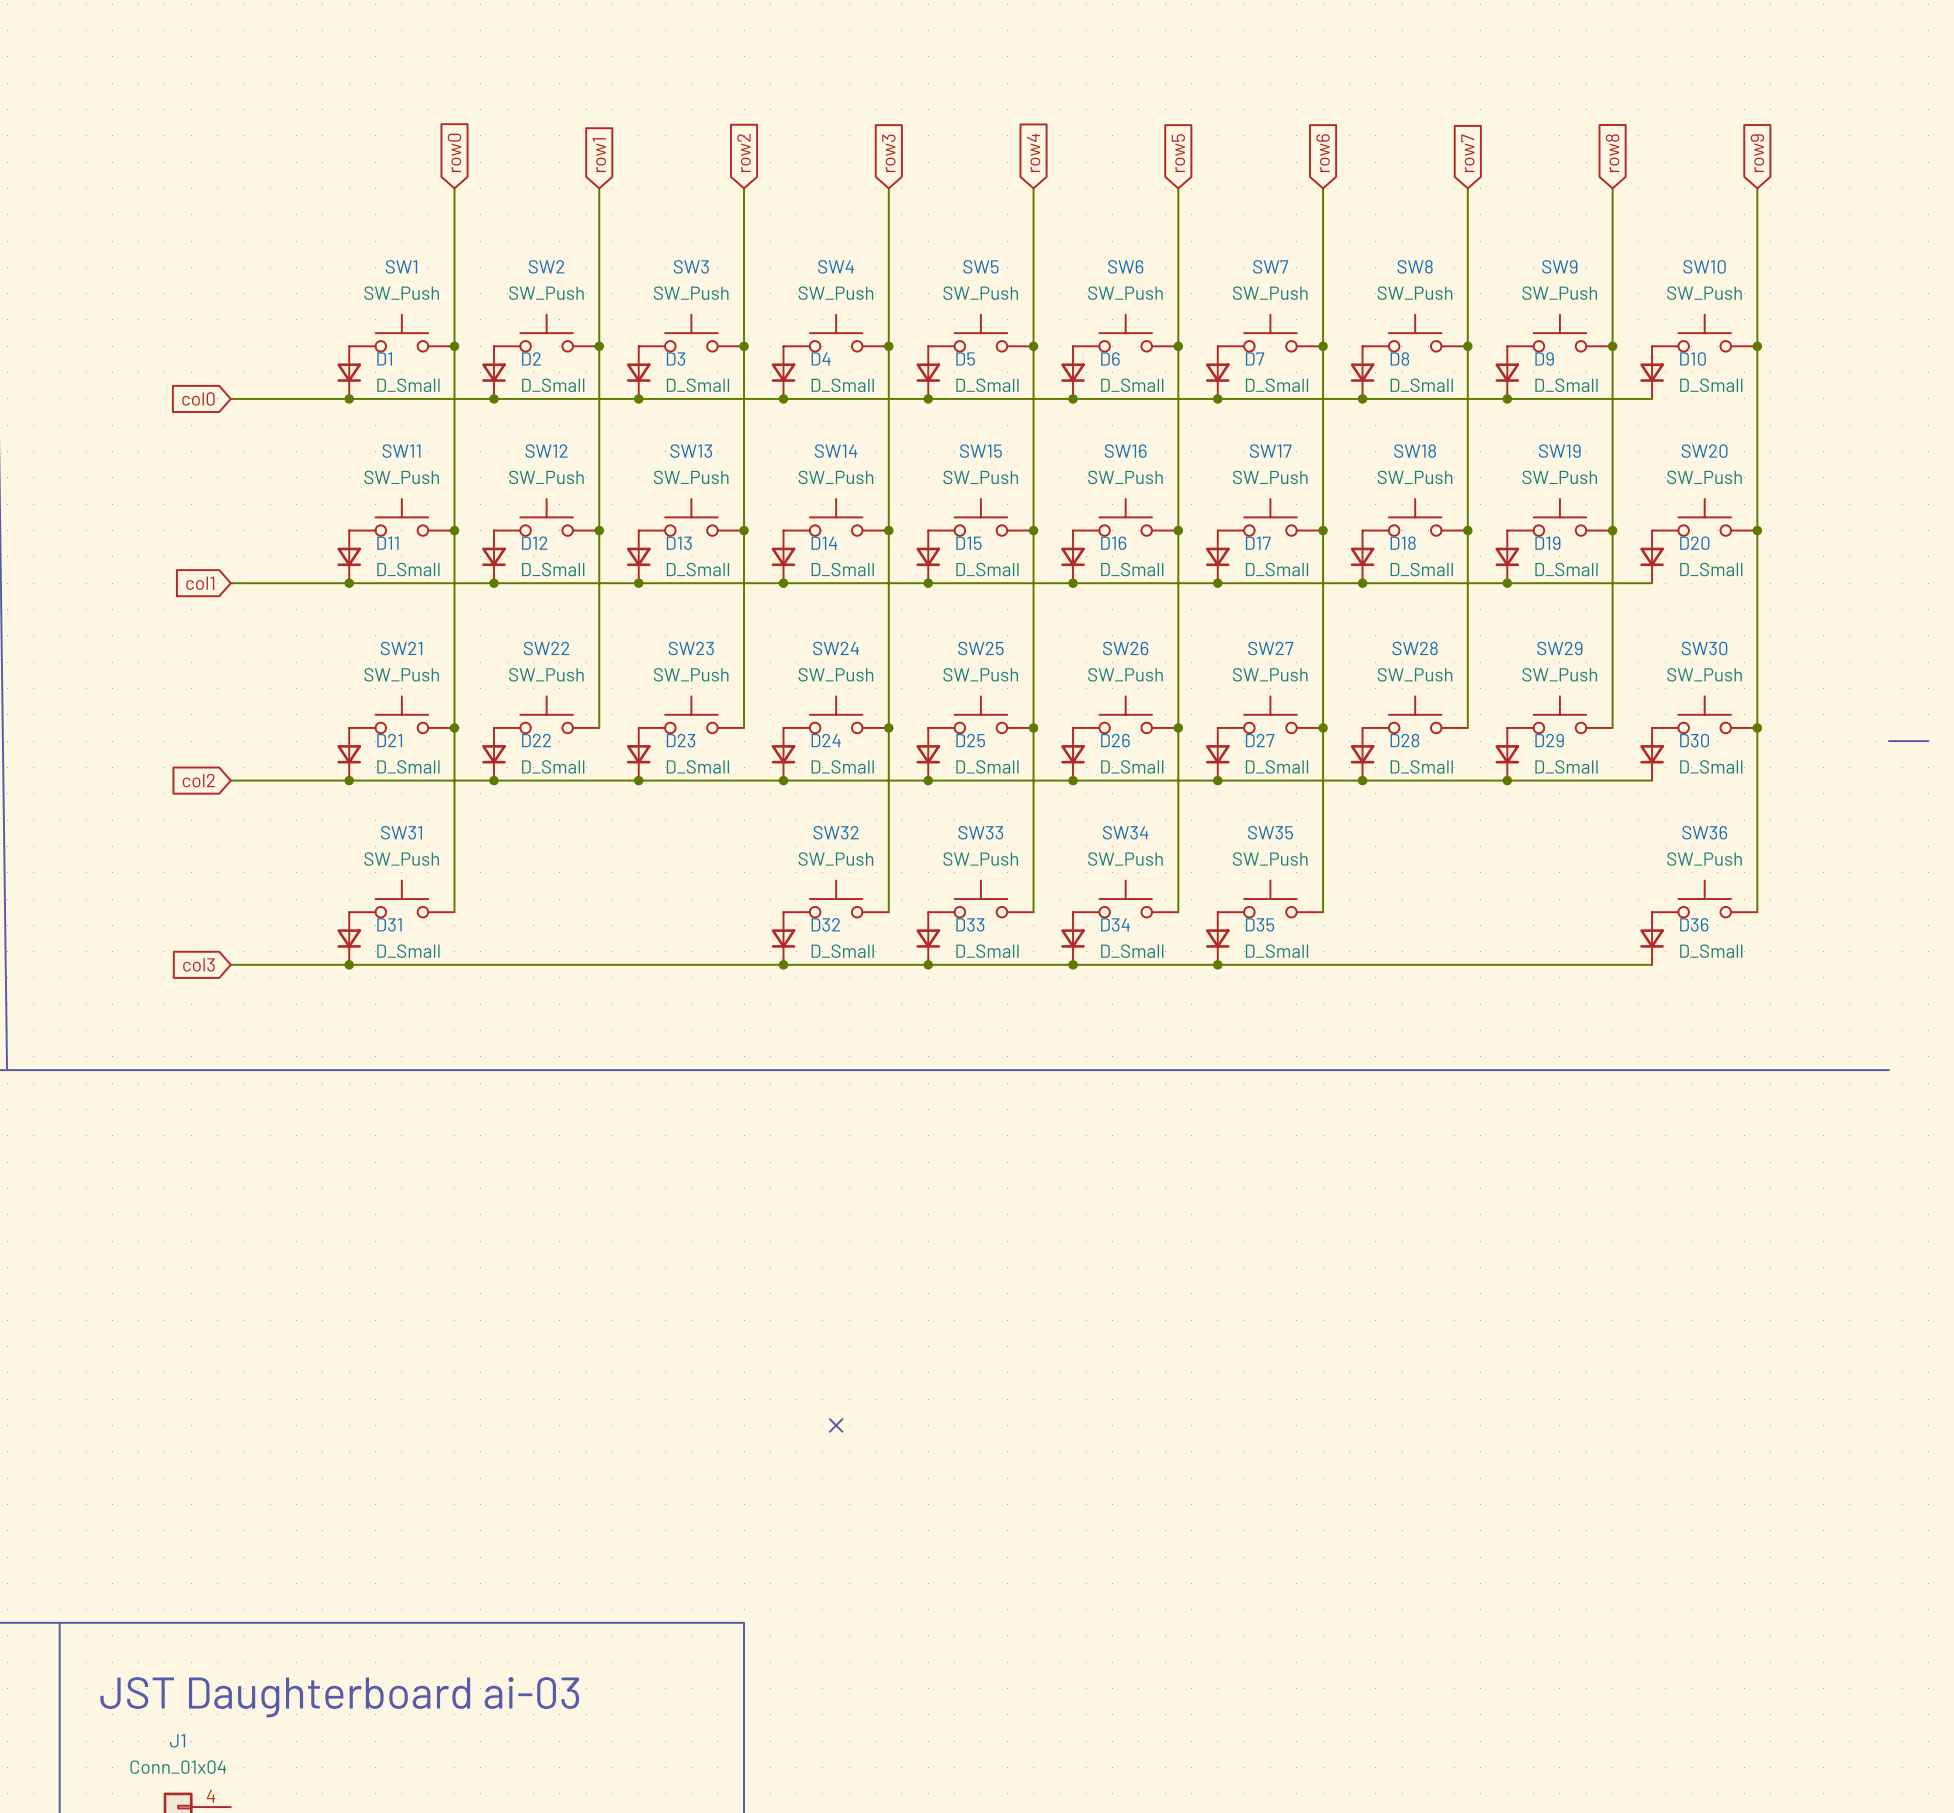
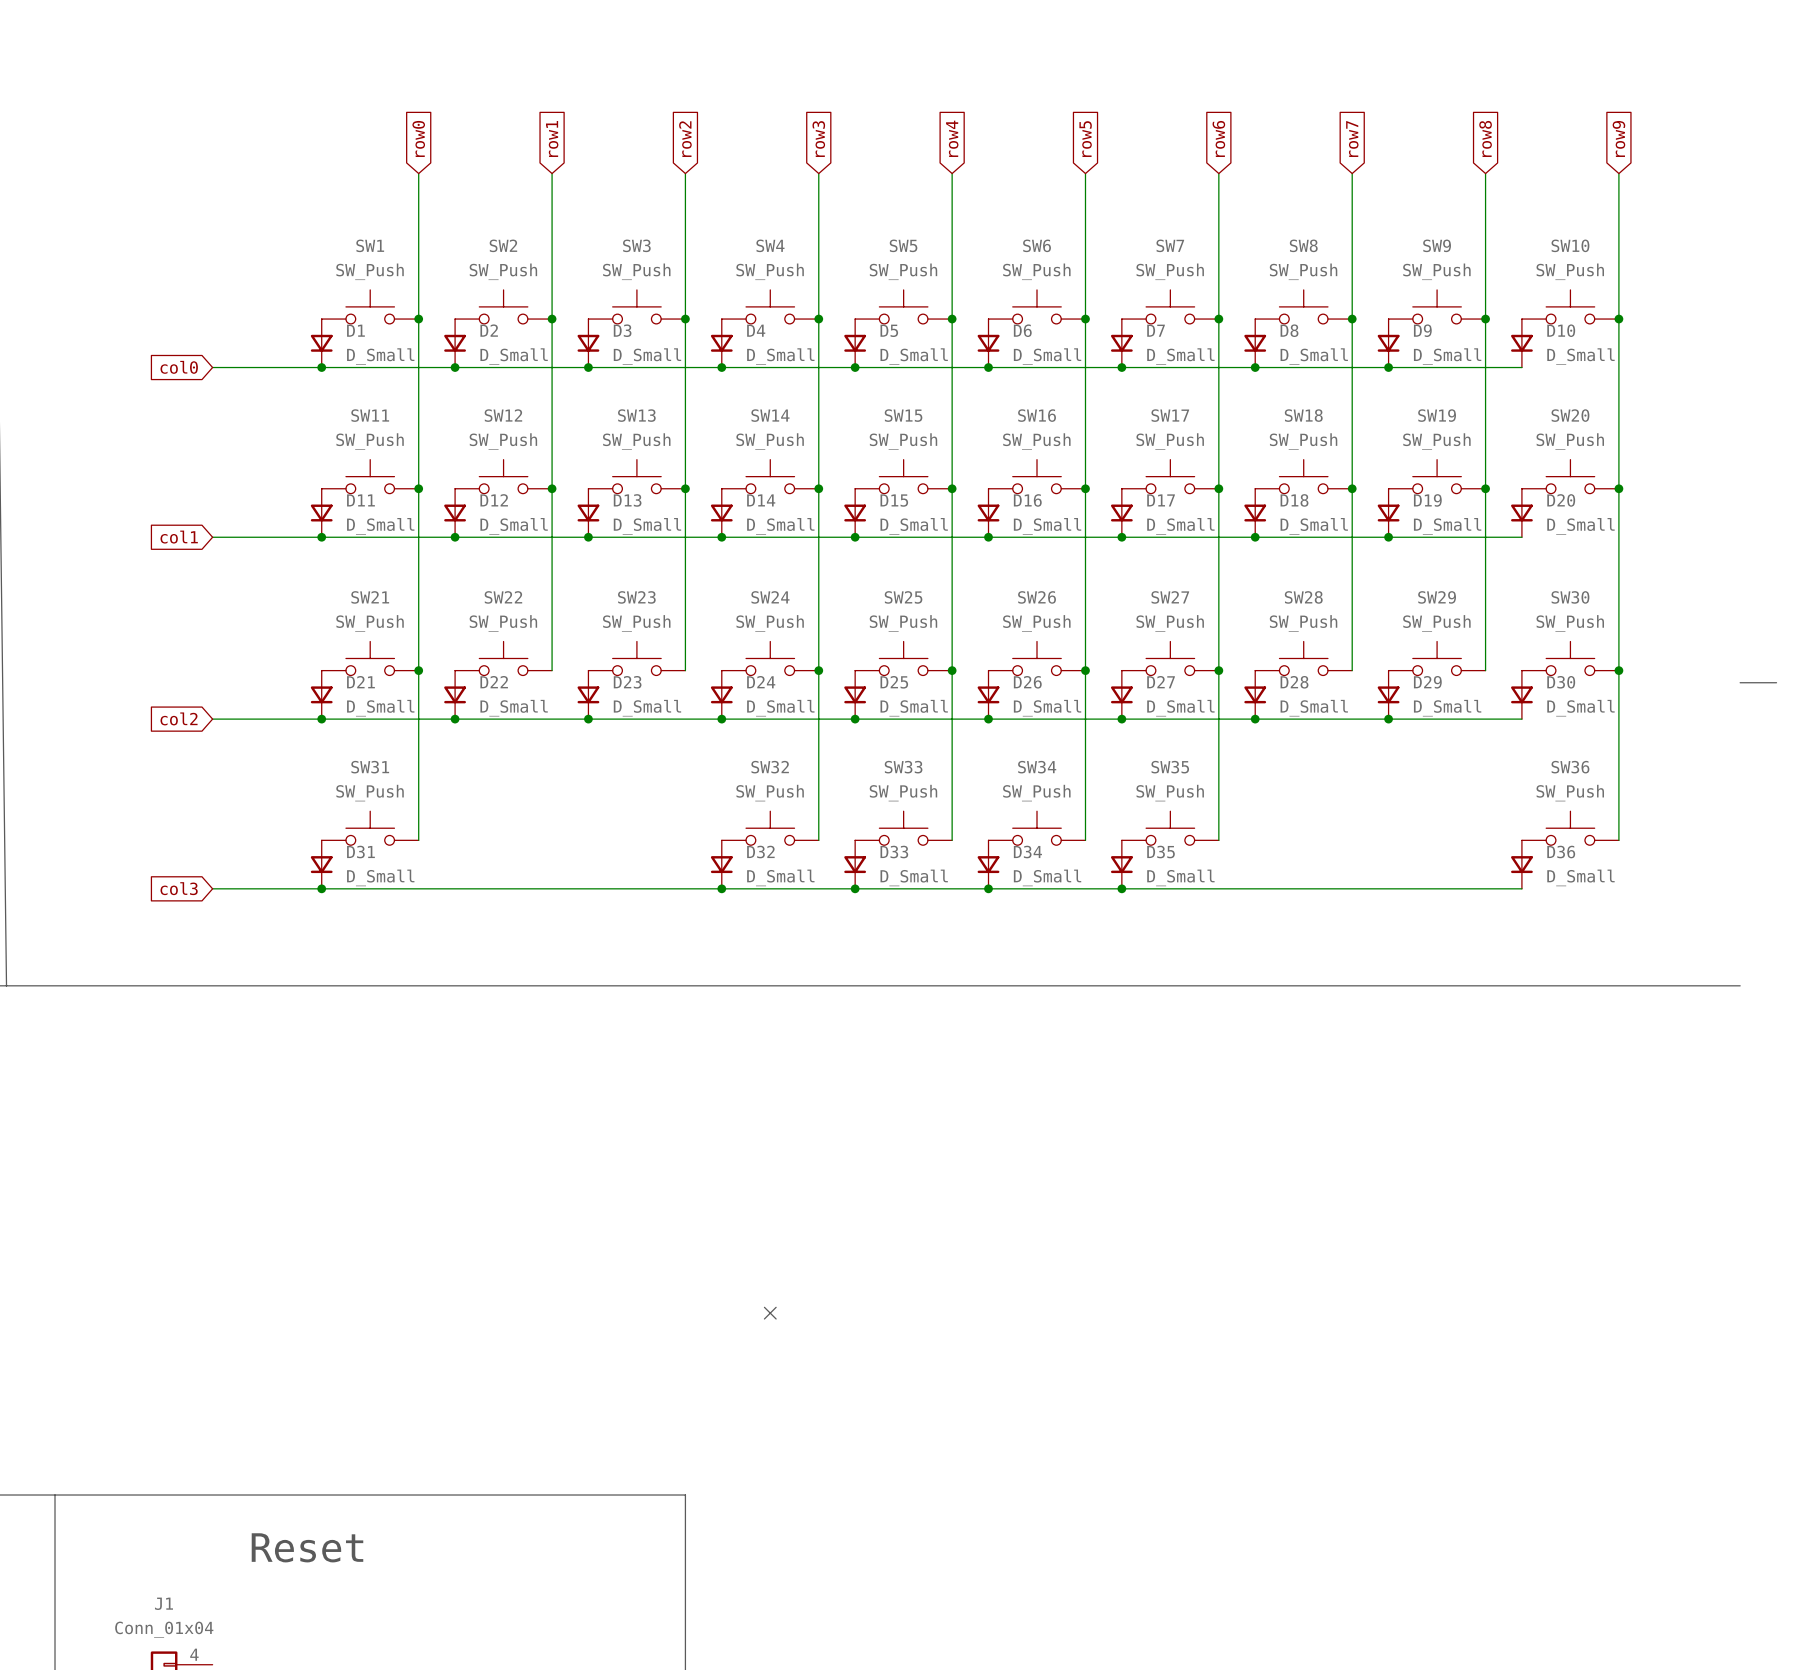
text: none -> Reset (307, 1547)
text: JST Daughterboard ai-03 (339, 1697) -> none

